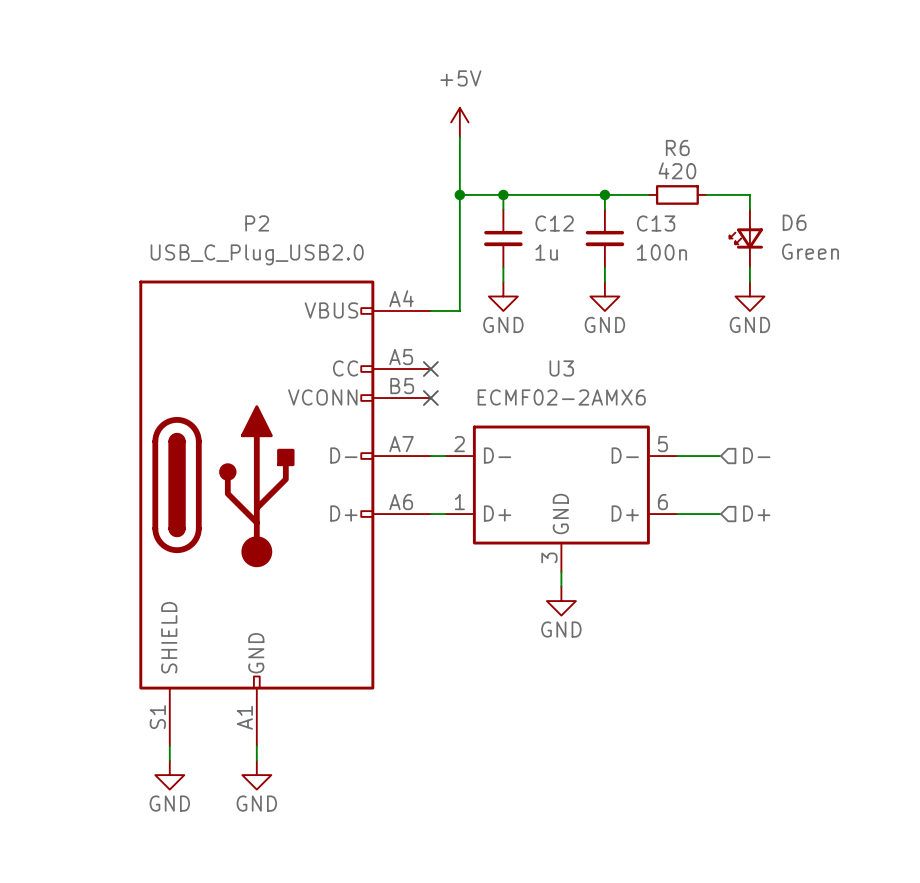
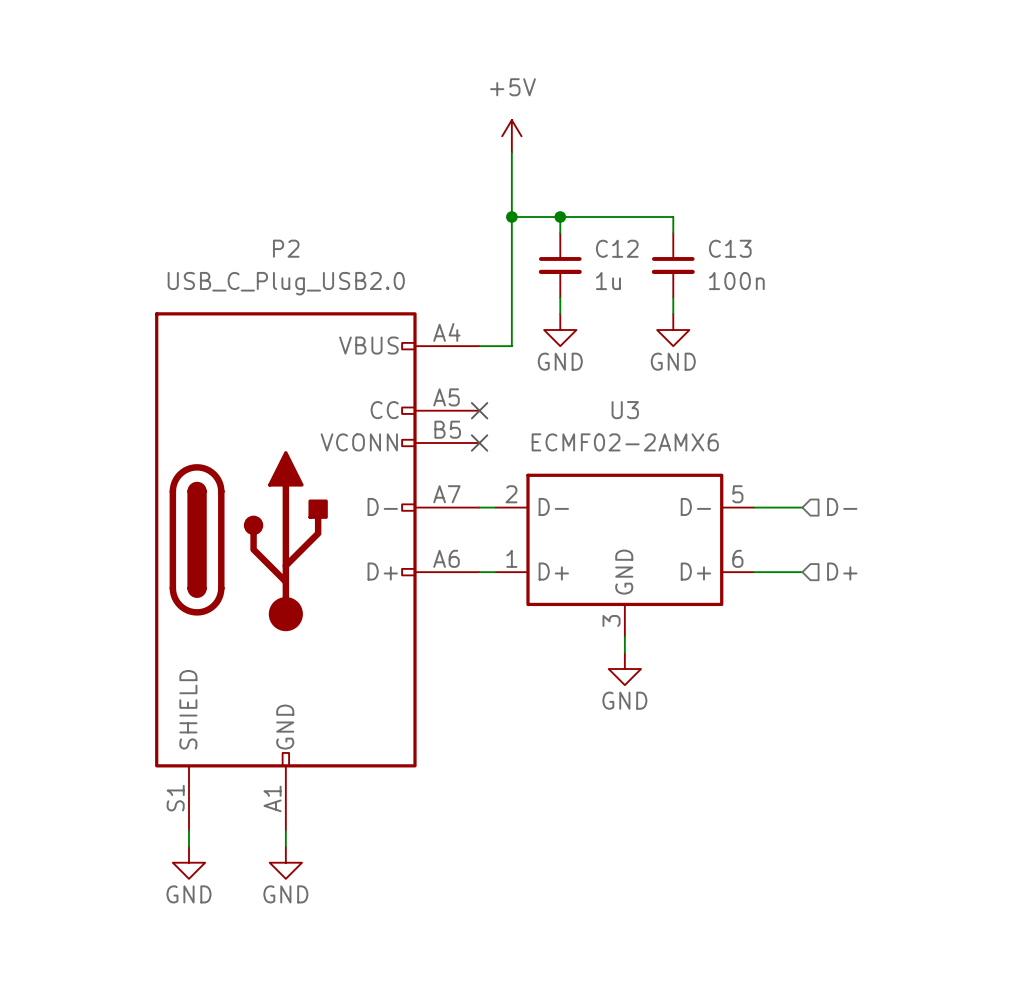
wire: (604, 194) (648, 194) -> none
junction: (604, 194) -> none
R6: 420 (677, 194) -> none
wire: (706, 194) (749, 194) (749, 209) -> none
D6: Green (746, 238) -> none
wire: (749, 267) (749, 281) -> none
power symbol: GND (749, 296) -> none

